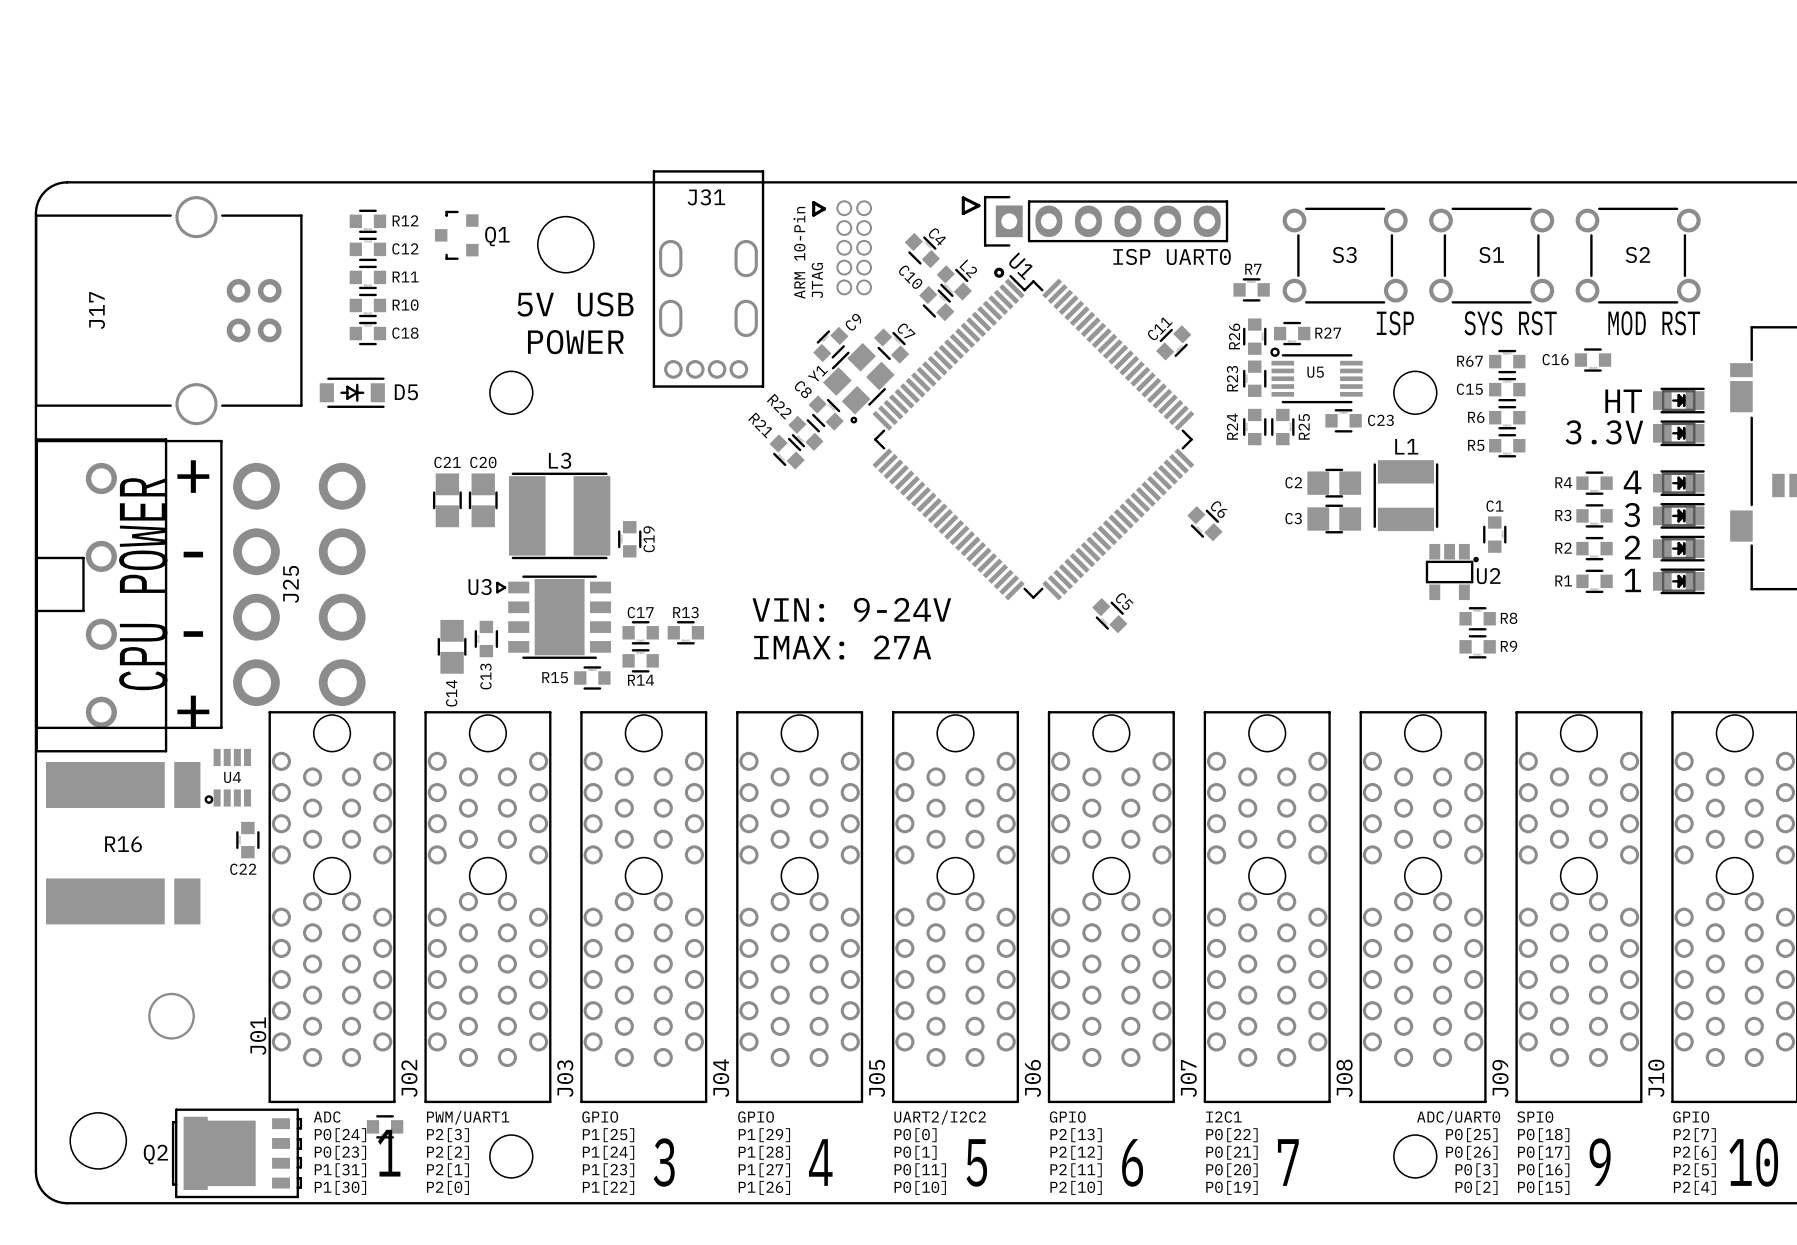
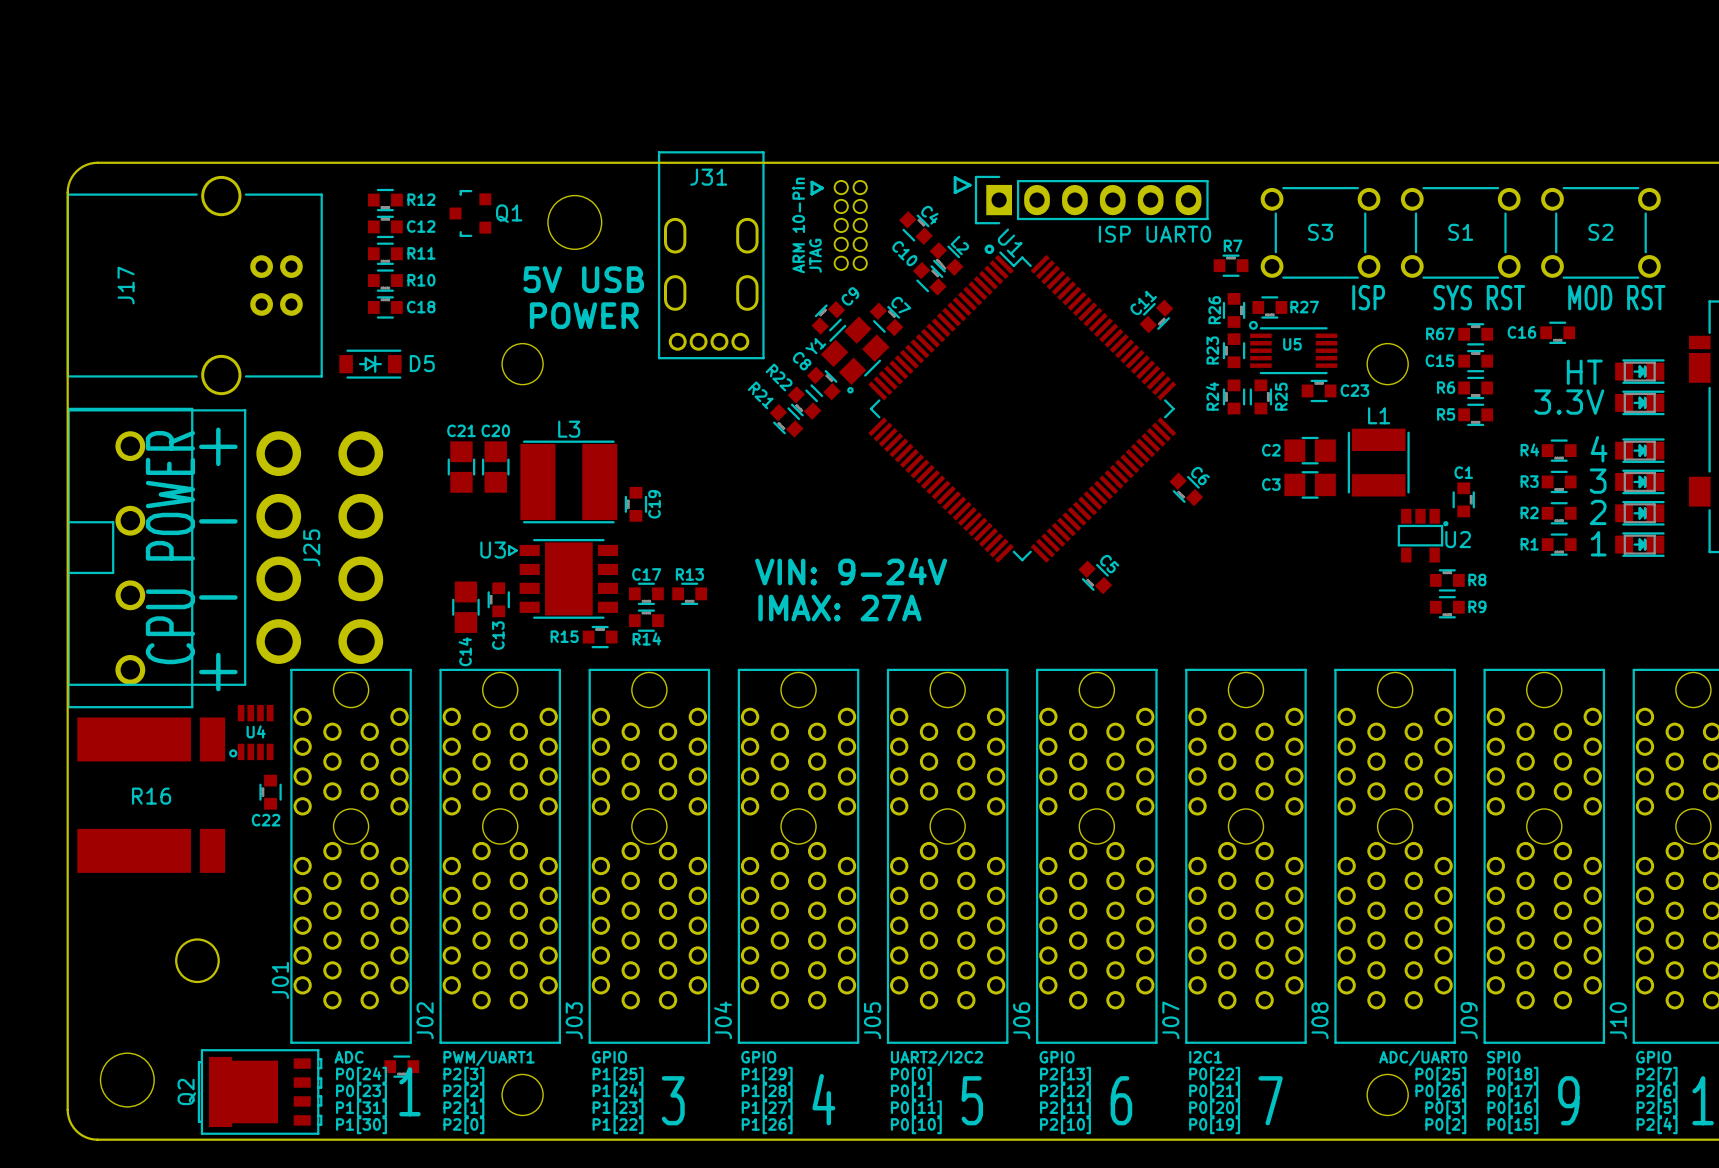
Q2 name rotation: 0° (155, 1154) -> 90° counterclockwise (186, 1091)

